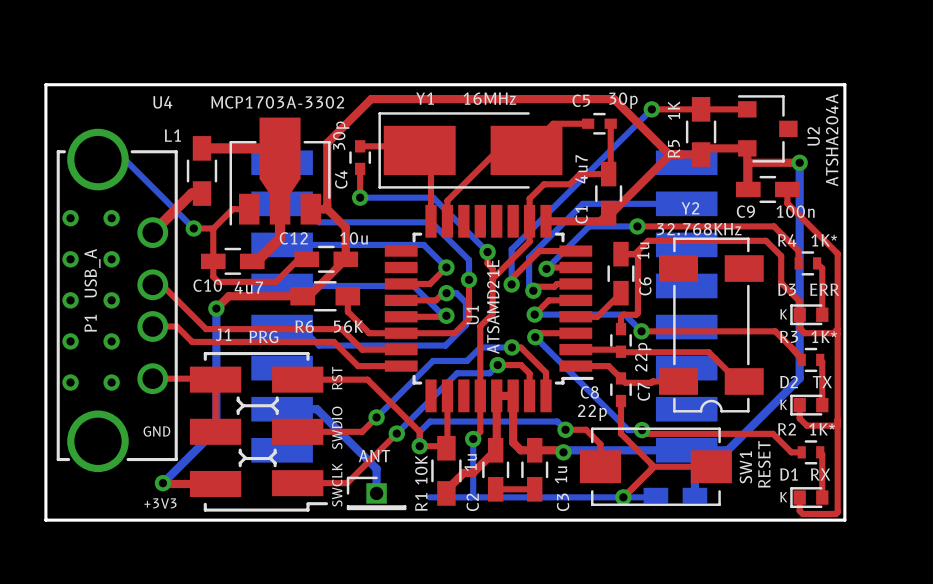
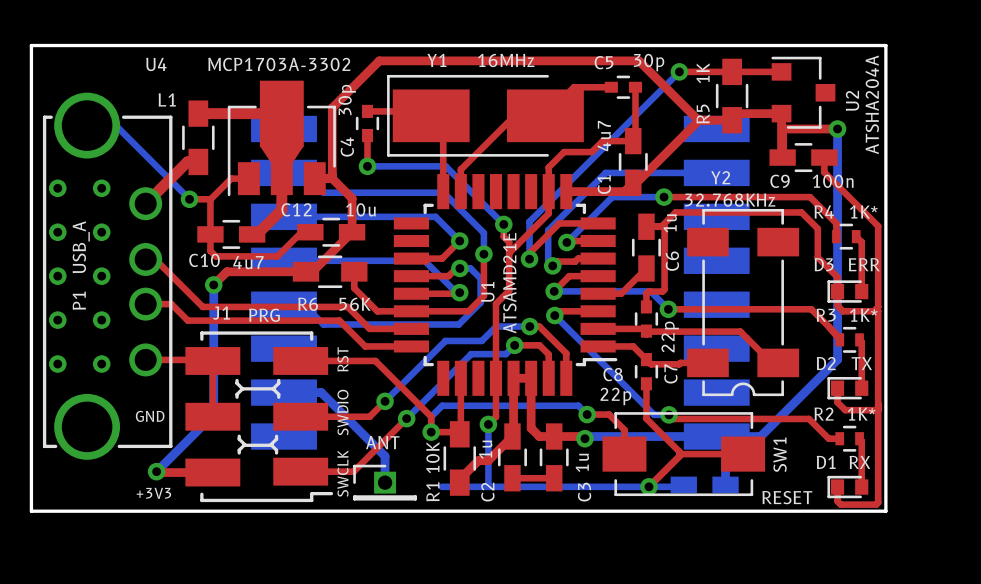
text: K (783, 314) -> none
text: K (783, 404) -> none
SW1 value rotation: 0° (764, 464) -> 90° clockwise (787, 497)
text: K (783, 497) -> none

